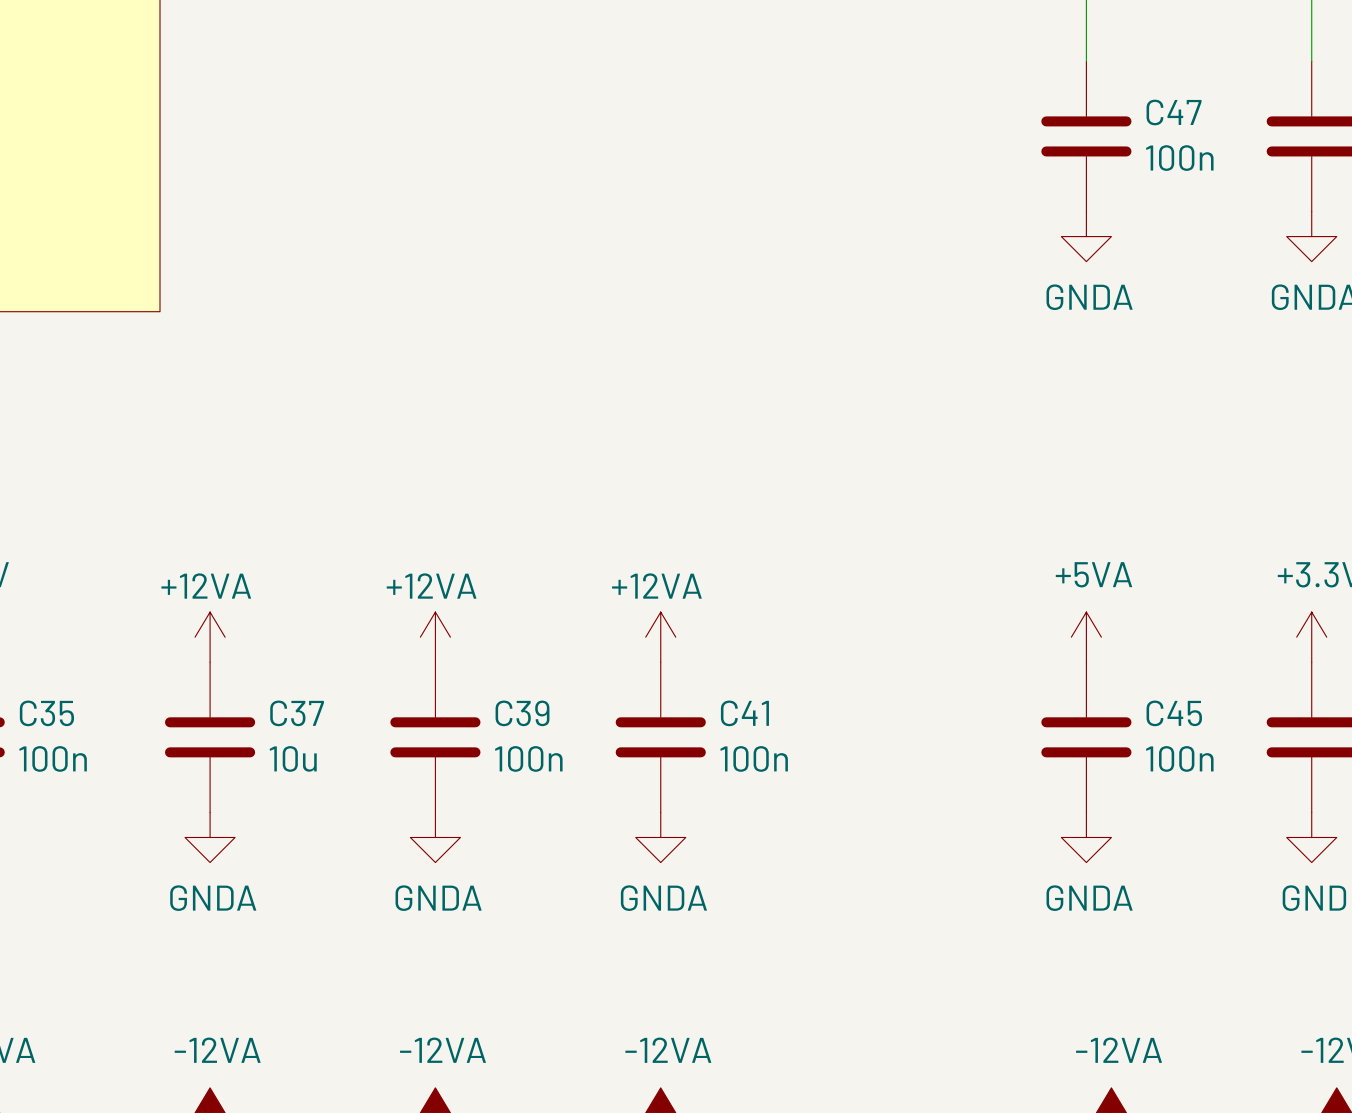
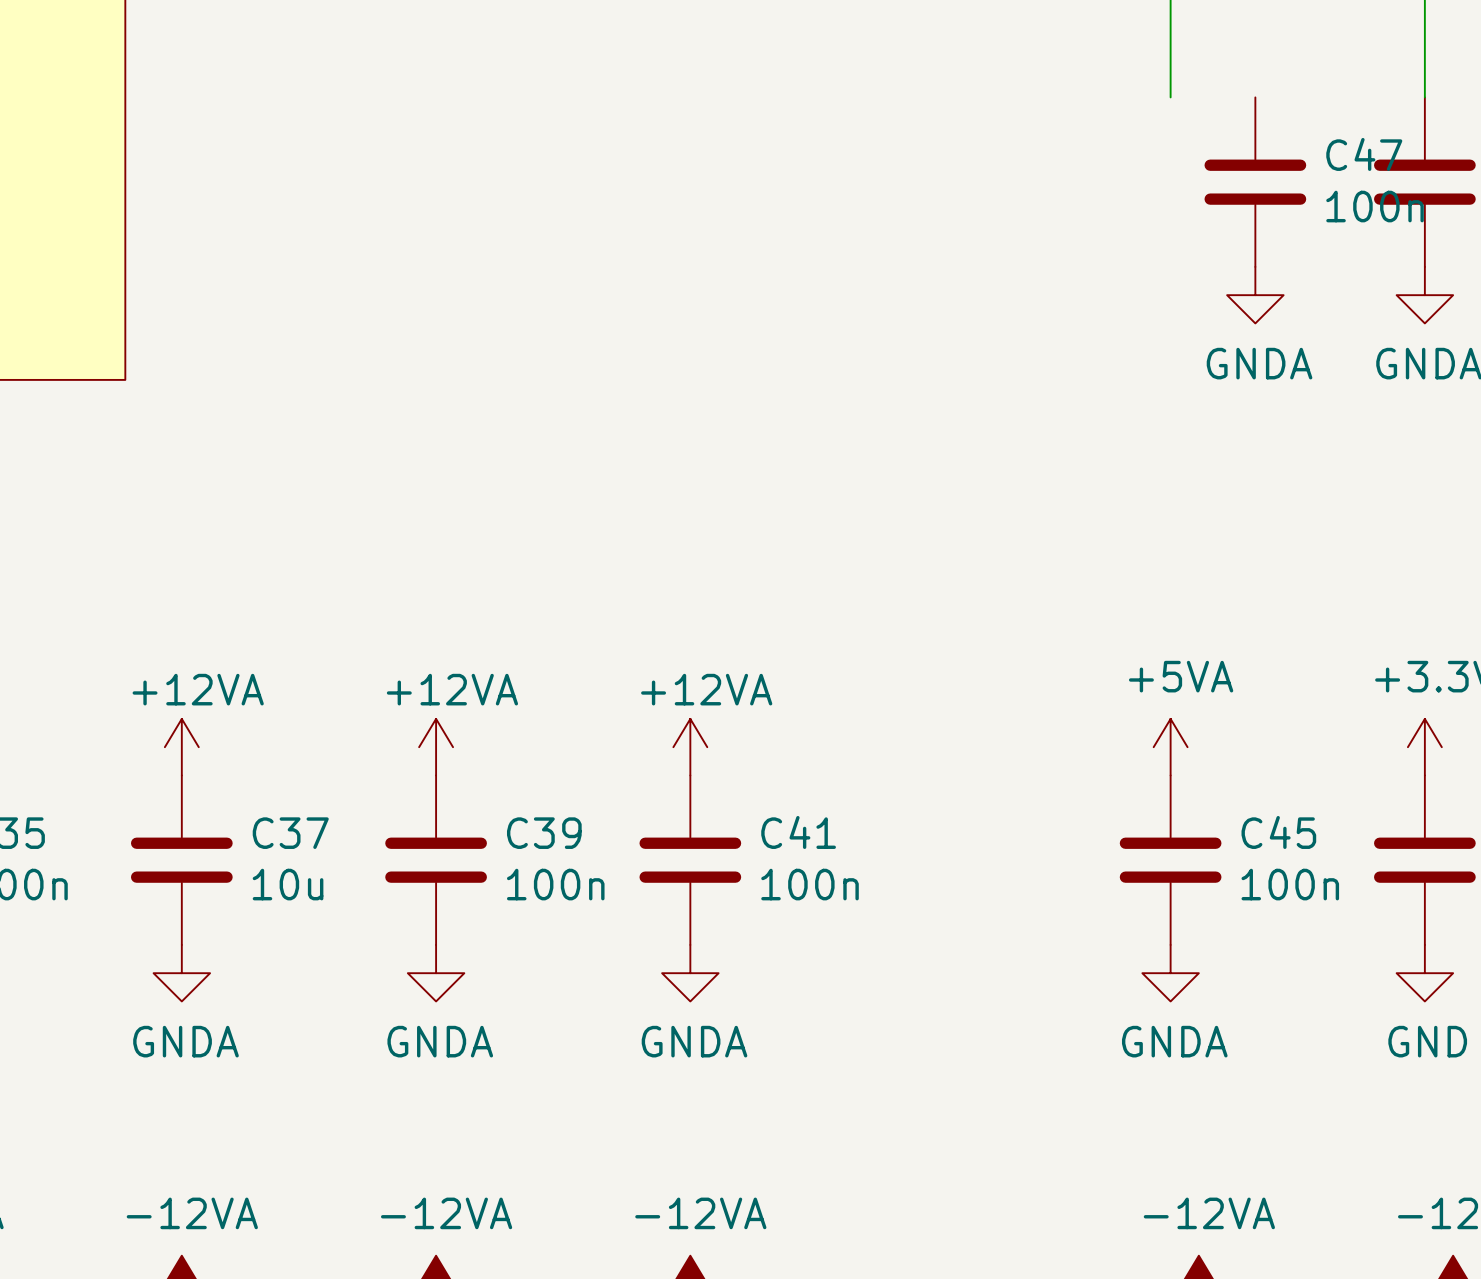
C47 position: (1086, 136) -> (1255, 182)
power symbol position: GNDA (1086, 236) -> GNDA (1255, 295)

